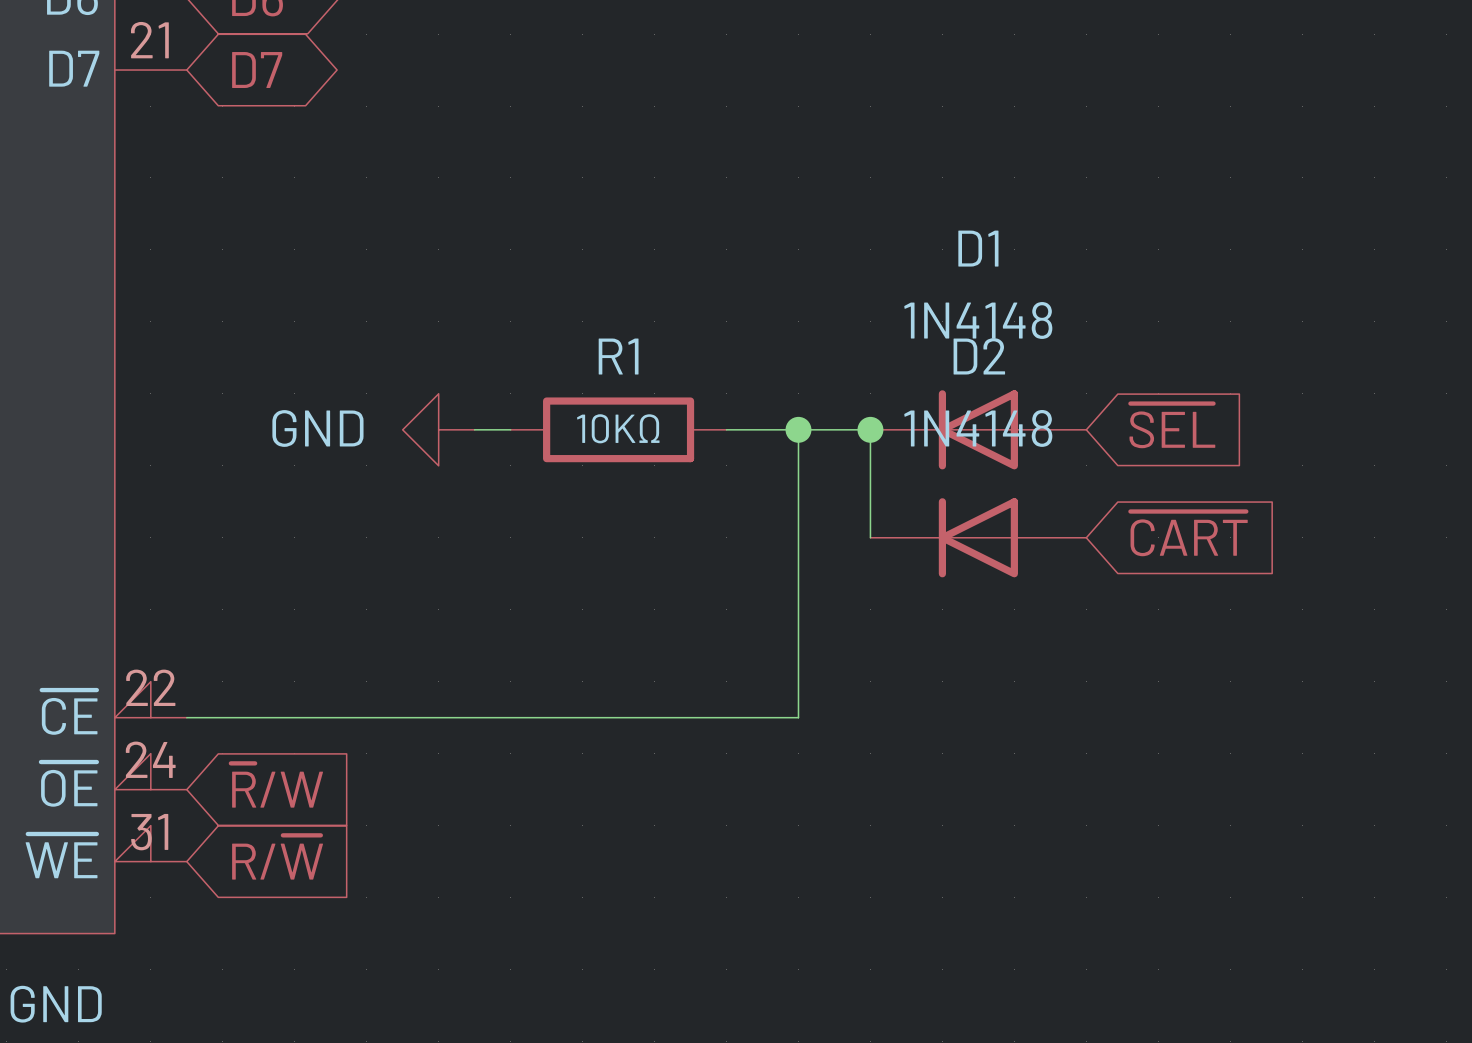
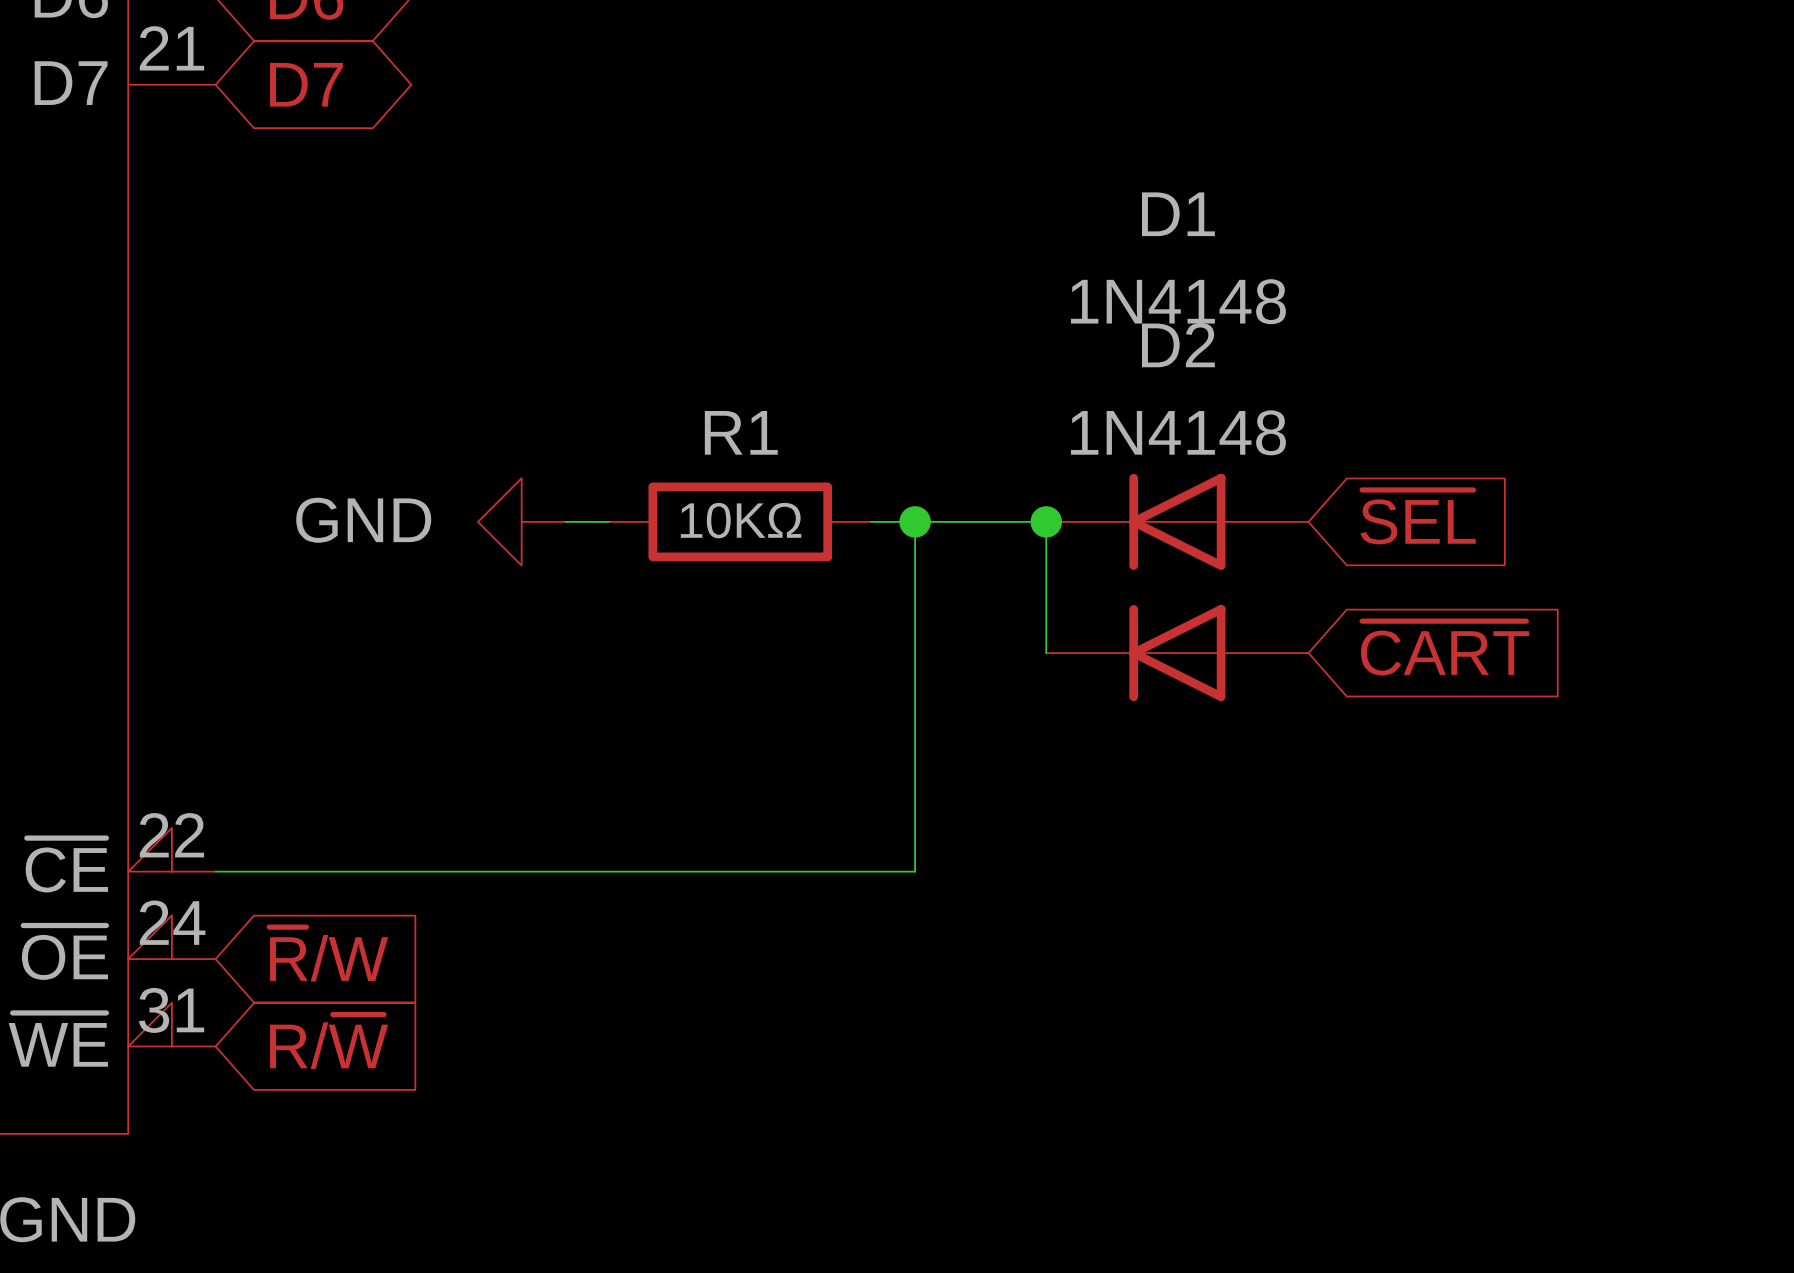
D1 name position: D1 (978, 248) -> D1 (1178, 214)
D1 value position: 1N4148 (978, 320) -> 1N4148 (1178, 301)
D2 name position: D2 (979, 356) -> D2 (1178, 345)
D2 value position: 1N4148 (978, 428) -> 1N4148 (1178, 432)
wire: (798, 429) (798, 717) (762, 717) -> (915, 521) (915, 871)
junction position: (798, 429) -> (915, 521)

